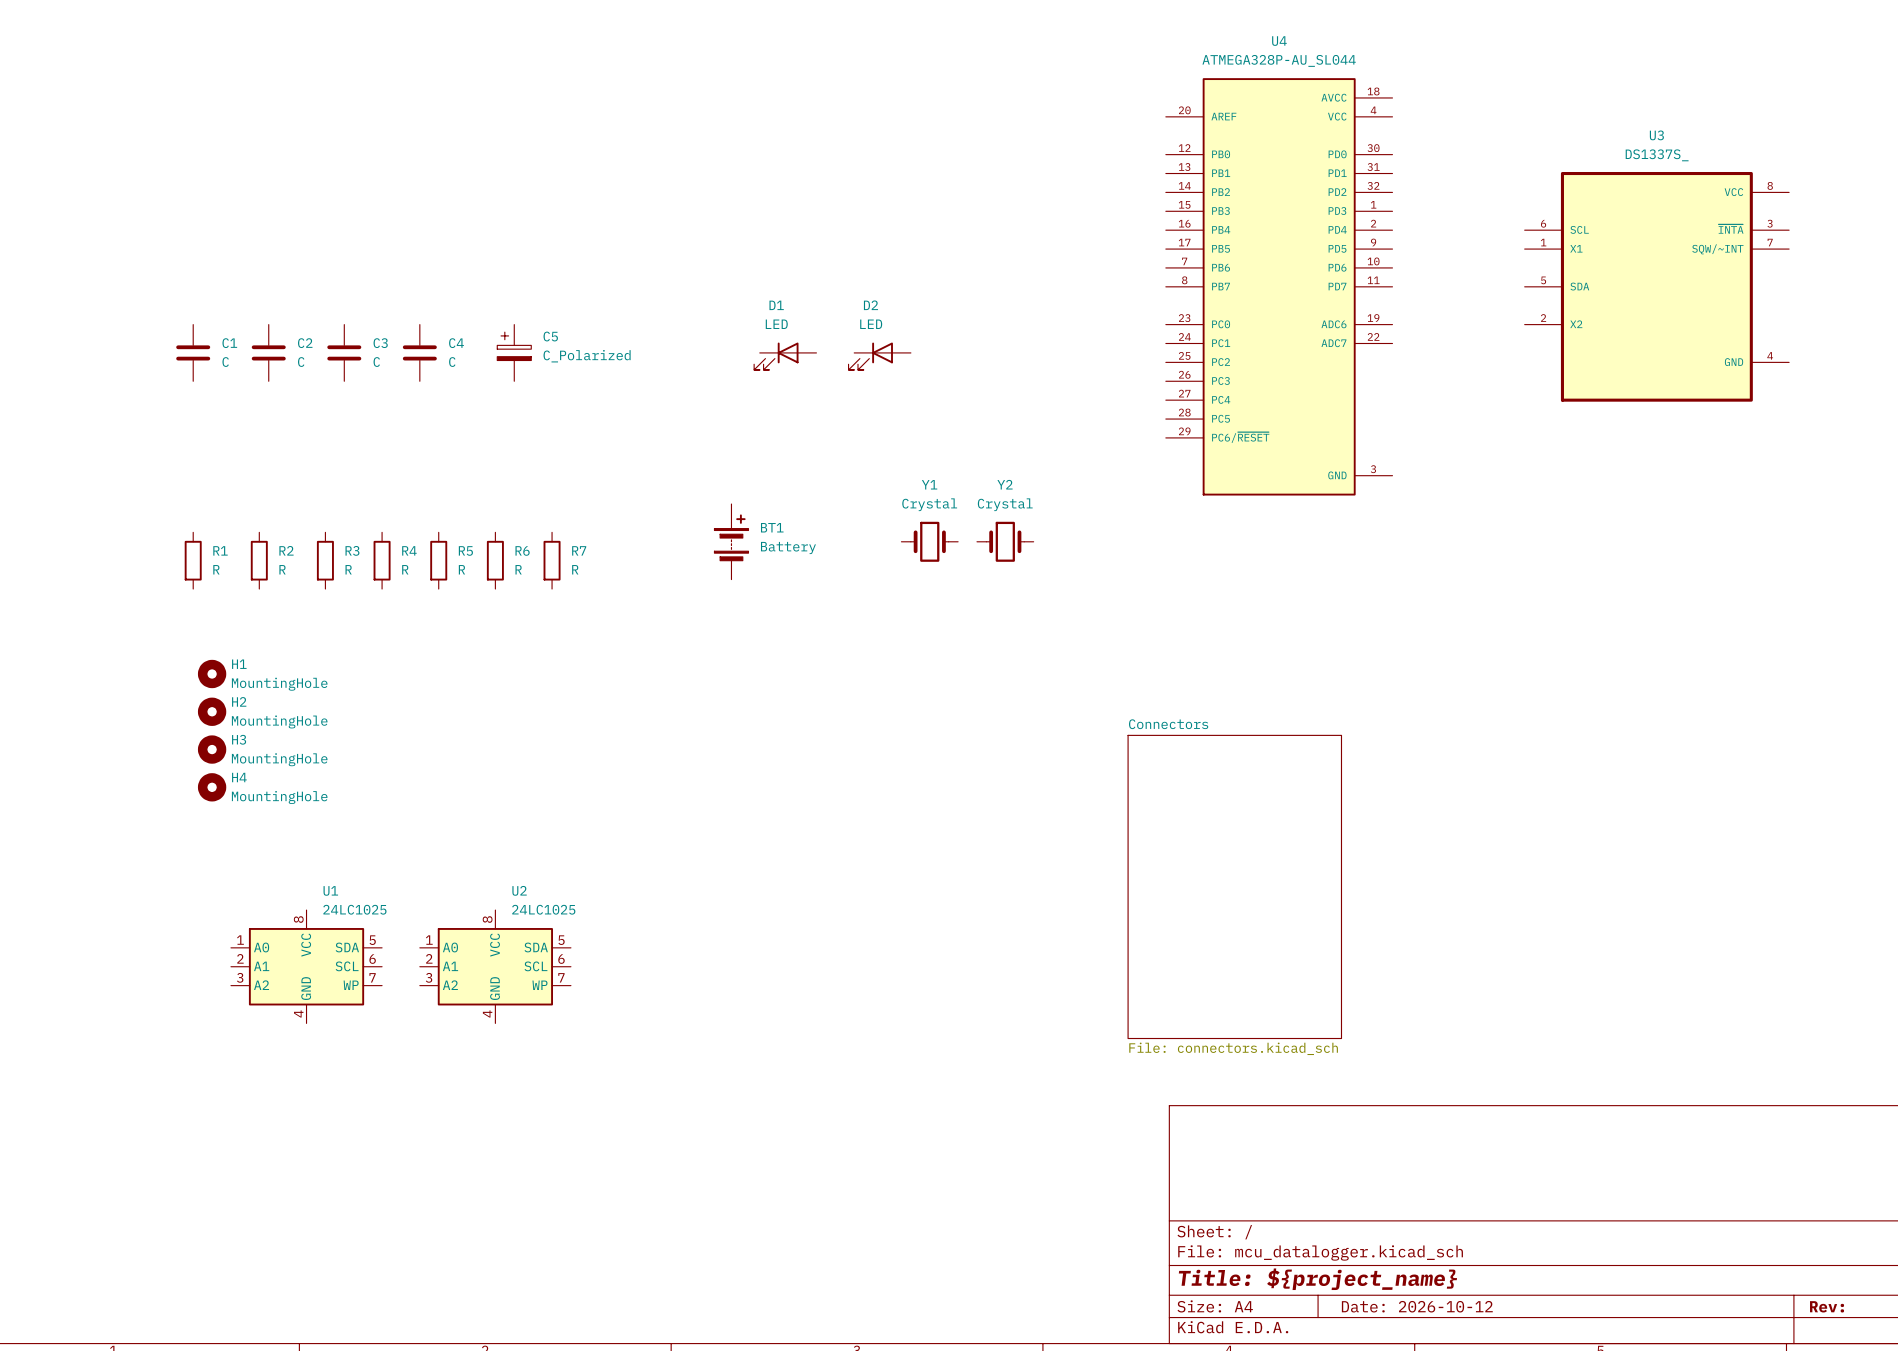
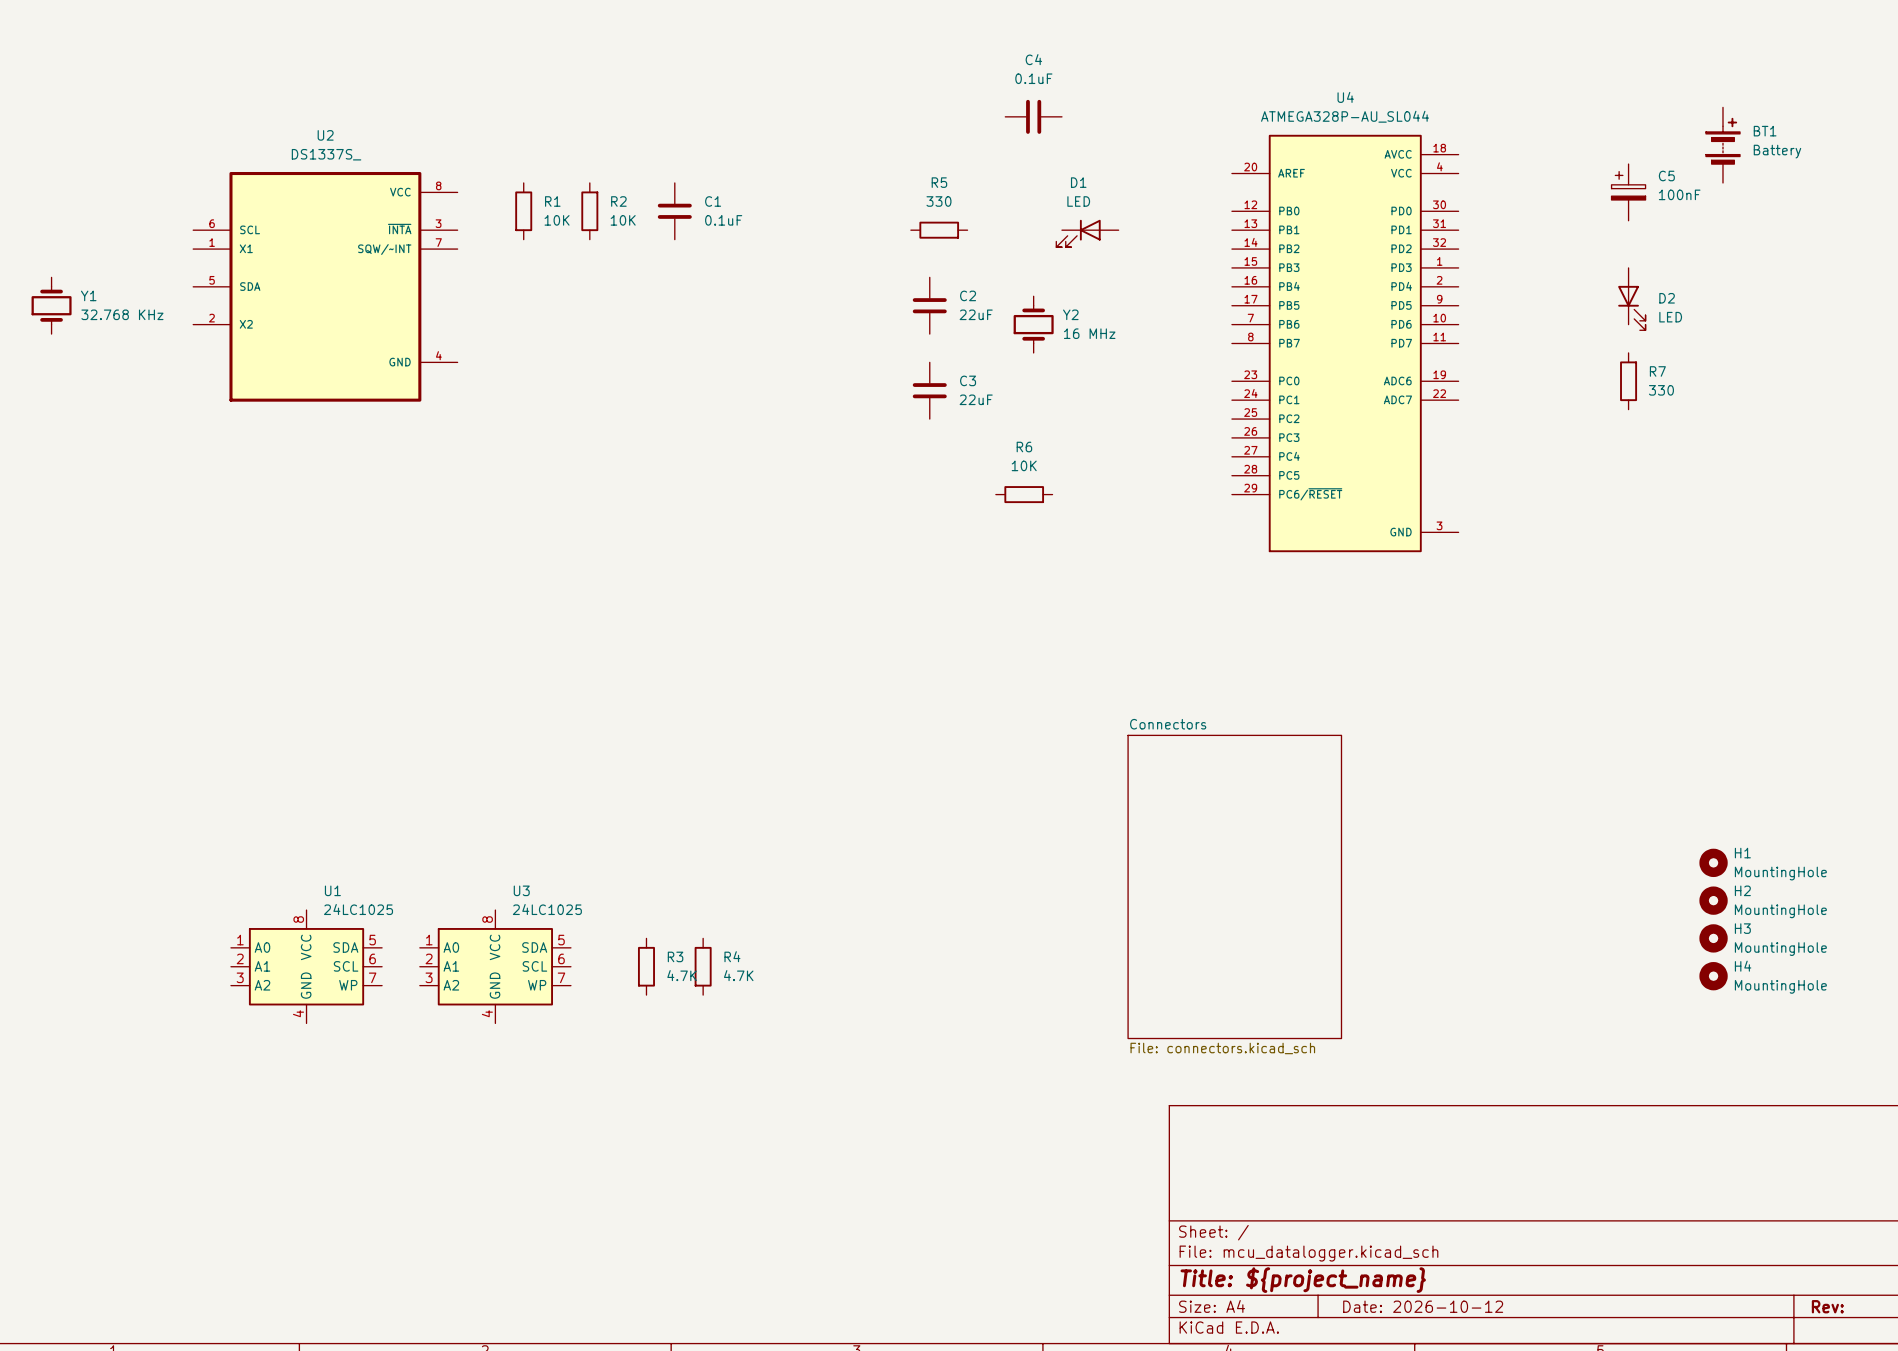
U2: none -> DS1337S_ (325, 286)
U4 position: (1279, 286) -> (1345, 343)
U3: DS1337S_ (1656, 286) -> none
D2 name position: D2 (870, 305) -> D2 (1667, 298)
D2 value position: LED (871, 324) -> LED (1670, 317)
C4 name position: C4 (456, 343) -> C4 (1033, 59)
C1 position: (193, 352) -> (674, 211)
C2 position: (268, 352) -> (929, 305)
C3 position: (344, 352) -> (929, 390)
C4 rotation: 0° (419, 352) -> 90° clockwise (1033, 116)
C4 position: (419, 352) -> (1033, 116)
C5 position: (514, 352) -> (1628, 192)
C5 value: C_Polarized (587, 356) -> 100nF (1679, 194)
D1 position: (785, 356) -> (1087, 233)
D2 rotation: 0° (870, 356) -> 90° counterclockwise (1631, 308)
D2 position: (879, 356) -> (1631, 299)
C1 value: C (225, 362) -> 0.1uF (723, 220)
C2 value: C (301, 362) -> 22uF (976, 314)
C3 value: C (376, 362) -> 22uF (976, 399)
C4 value: C (452, 362) -> 0.1uF (1033, 78)
Y1 name position: Y1 (929, 484) -> Y1 (88, 295)
Y2 name position: Y2 (1005, 484) -> Y2 (1070, 314)
Y1 value: Crystal (929, 504) -> 32.768 KHz (122, 314)
Y2 value: Crystal (1005, 504) -> 16 MHz (1089, 333)
BT1 position: (731, 541) -> (1722, 145)
Y1 rotation: 0° (929, 541) -> 90° clockwise (51, 305)
Y1 position: (929, 541) -> (51, 305)
Y2 rotation: 0° (1005, 541) -> 90° clockwise (1033, 324)
Y2 position: (1005, 541) -> (1033, 324)
R5 name position: R5 (465, 550) -> R5 (939, 182)
R6 name position: R6 (522, 550) -> R6 (1024, 447)
R1 position: (193, 560) -> (523, 211)
R2 position: (259, 560) -> (589, 211)
R3 position: (325, 560) -> (646, 966)
R4 position: (382, 560) -> (703, 966)
R5 rotation: 0° (438, 560) -> 90° clockwise (939, 230)
R5 position: (438, 560) -> (939, 230)
R6 rotation: 0° (495, 560) -> 90° clockwise (1024, 494)
R6 position: (495, 560) -> (1024, 494)
R7 position: (552, 560) -> (1628, 381)
R1 value: R (216, 569) -> 10K (557, 220)
R2 value: R (282, 569) -> 10K (623, 220)
R3 value: R (348, 569) -> 4.7K (682, 975)
R4 value: R (405, 569) -> 4.7K (738, 975)
R5 value: R (461, 569) -> 330 (938, 201)
R6 value: R (518, 569) -> 10K (1024, 465)
R7 value: R (575, 569) -> 330 (1661, 390)
H1 position: (212, 674) -> (1713, 862)
H2 position: (212, 711) -> (1713, 900)
H3 position: (212, 749) -> (1713, 938)
H4 position: (212, 787) -> (1713, 976)
U2 name: U2 (519, 890) -> U3 (521, 890)

